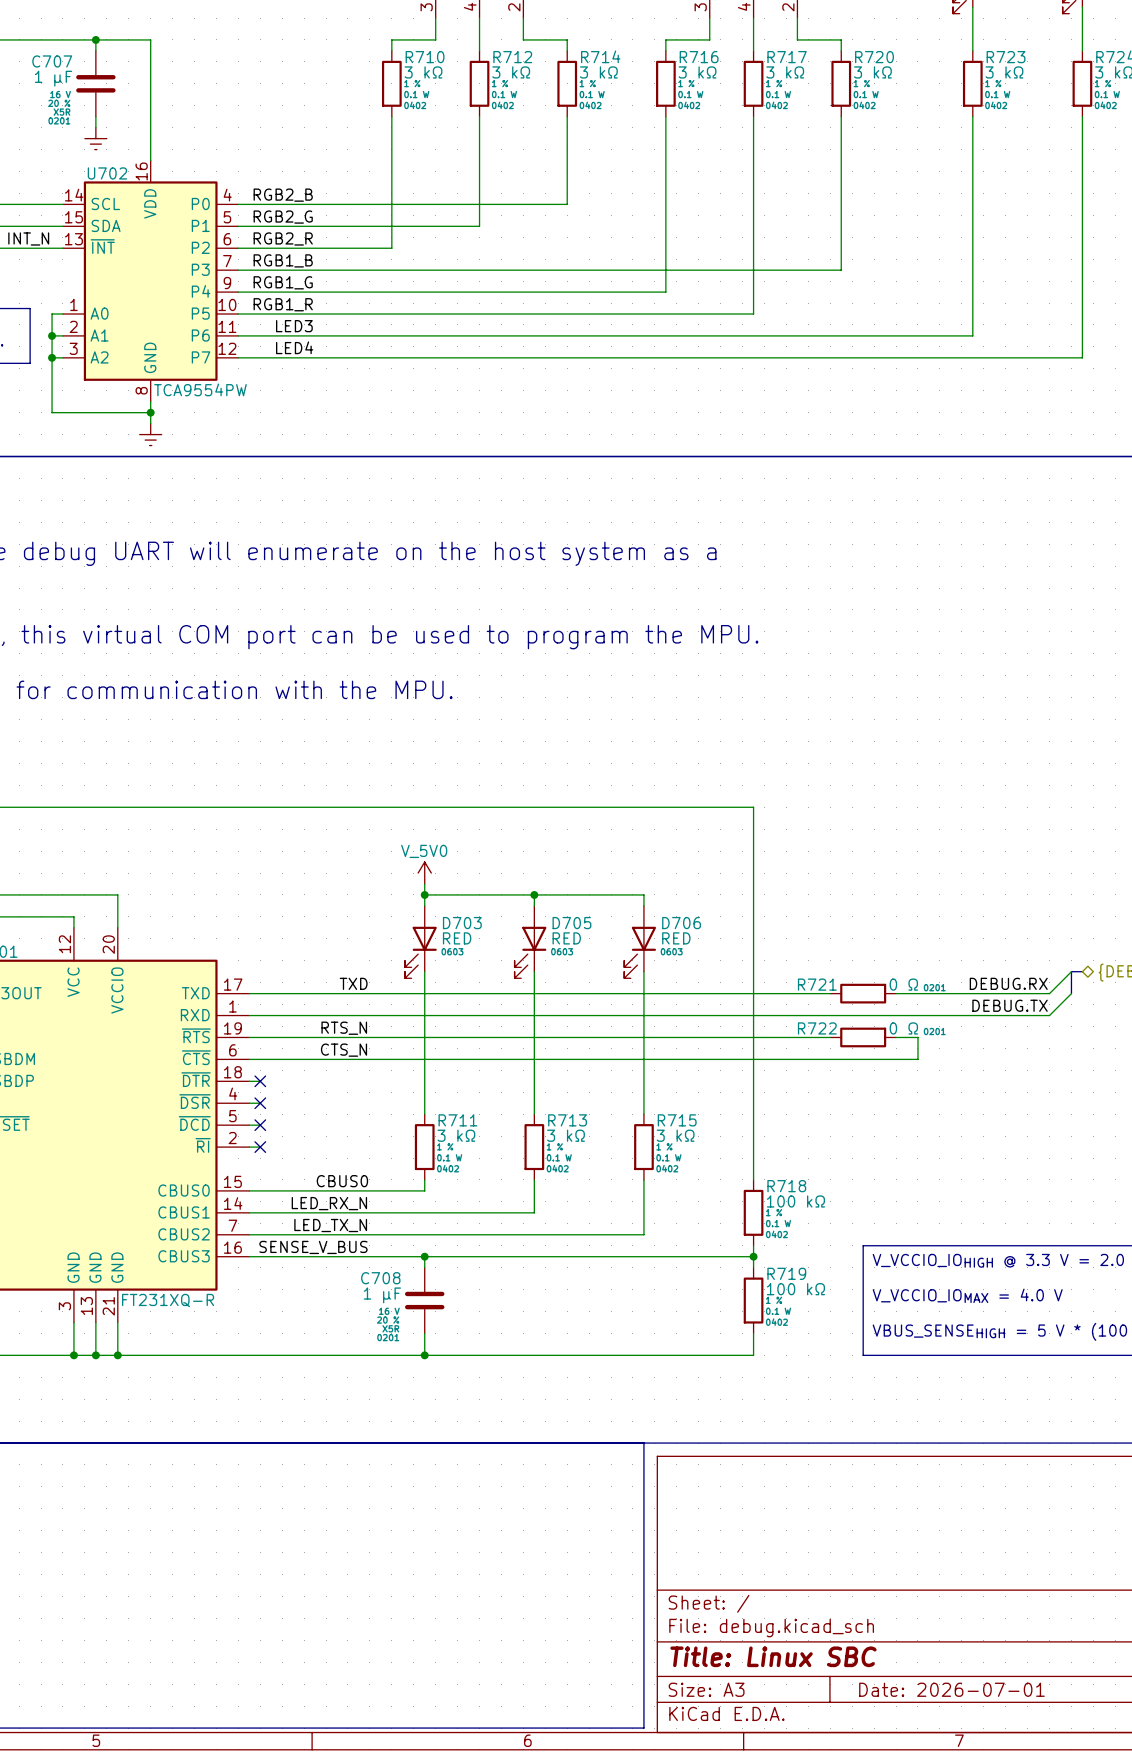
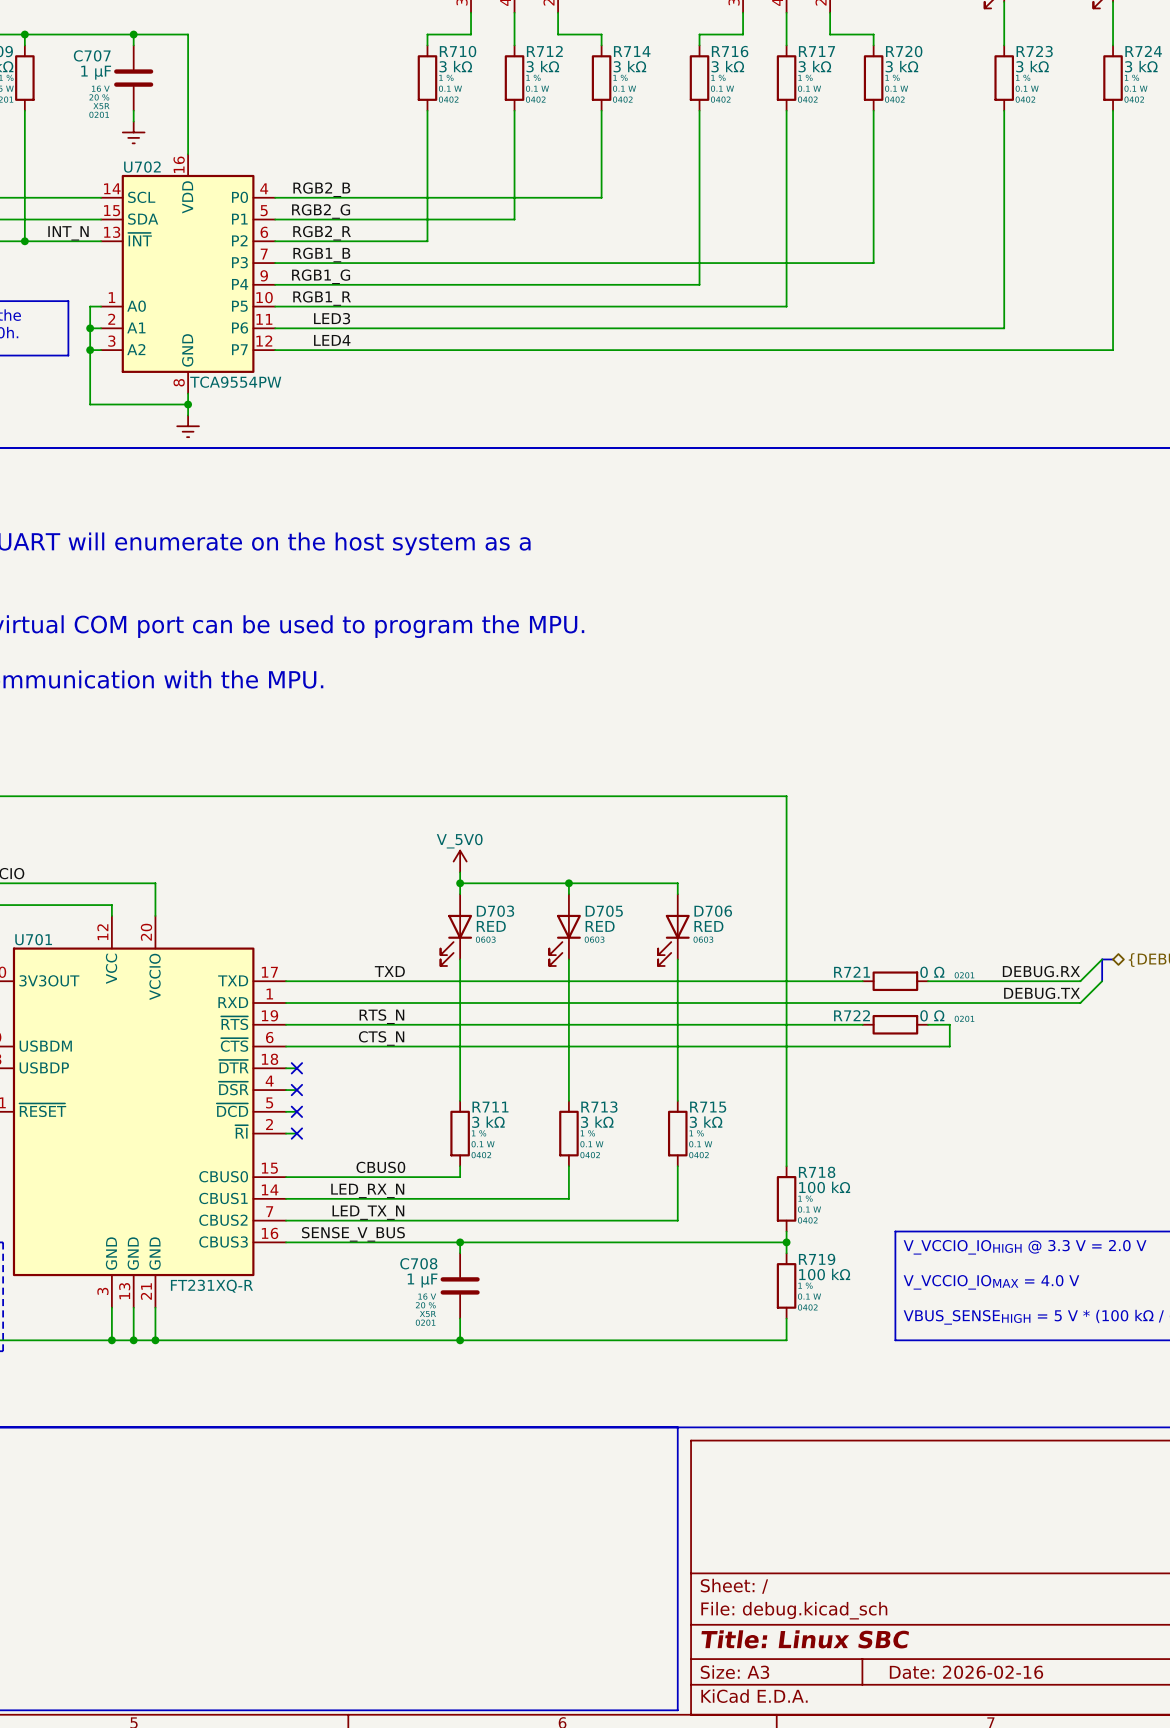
title block: Date: 2026-07-01 (951, 1689) -> Date: 2026-02-16 (966, 1672)

